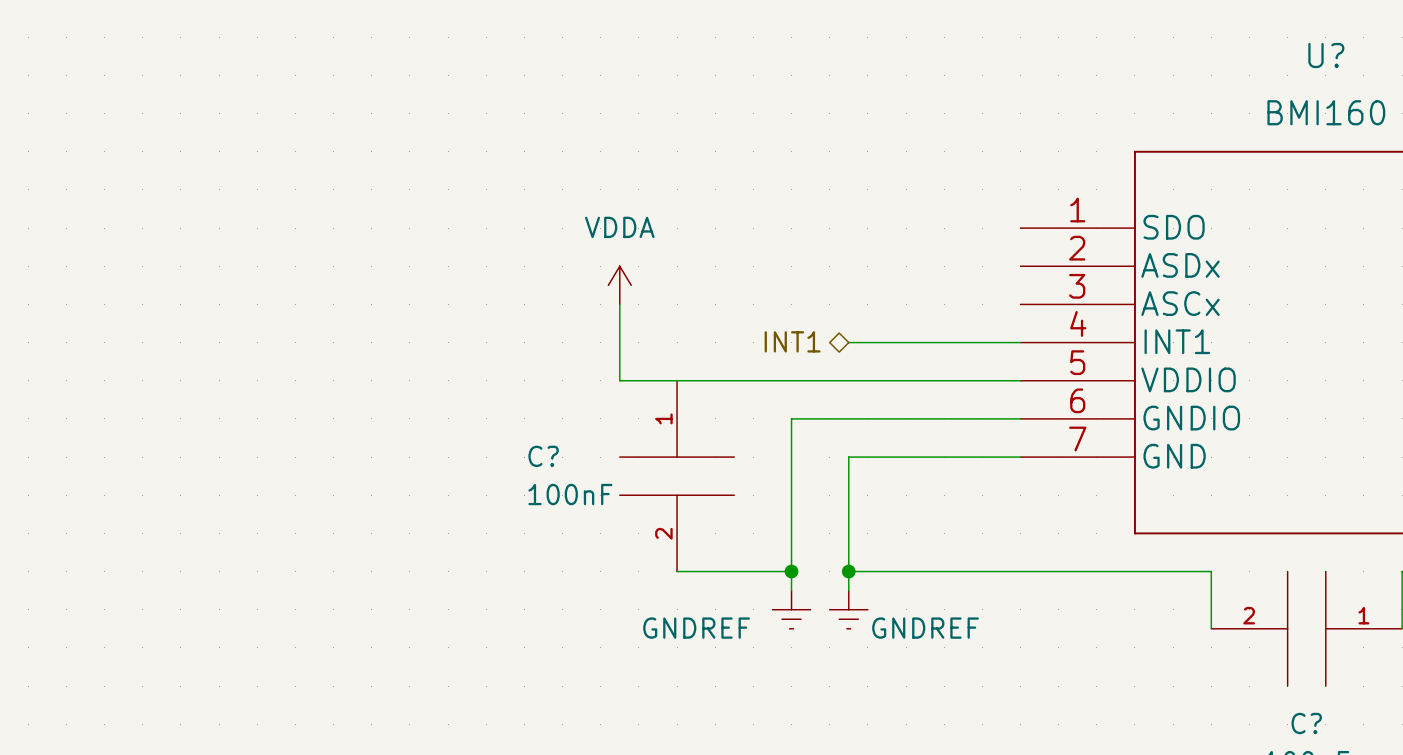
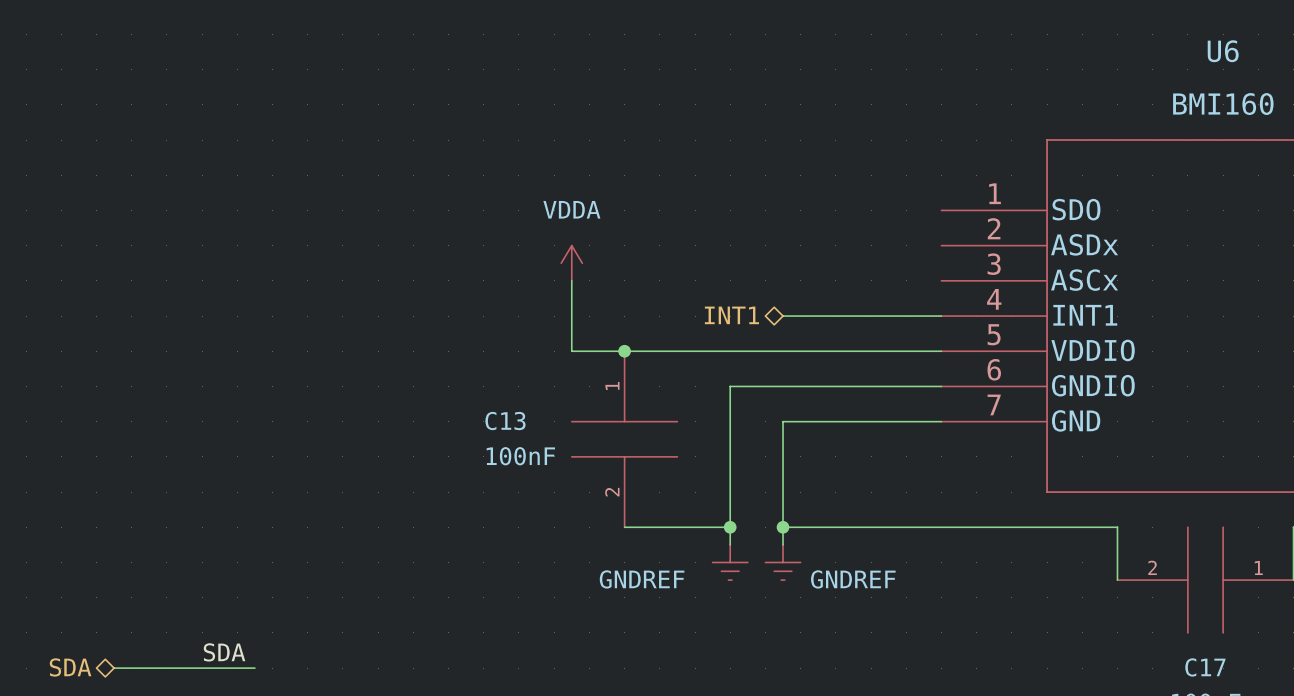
U? name: U? (1326, 55) -> U6 (1223, 51)
junction: none -> (624, 351)
C? name: C? (543, 456) -> C13 (505, 421)
label: none -> SDA (224, 652)
hierarchical label: none -> SDA (70, 667)
C? name: C? (1306, 723) -> C17 (1205, 667)
wire: none -> (114, 668) (254, 668)

